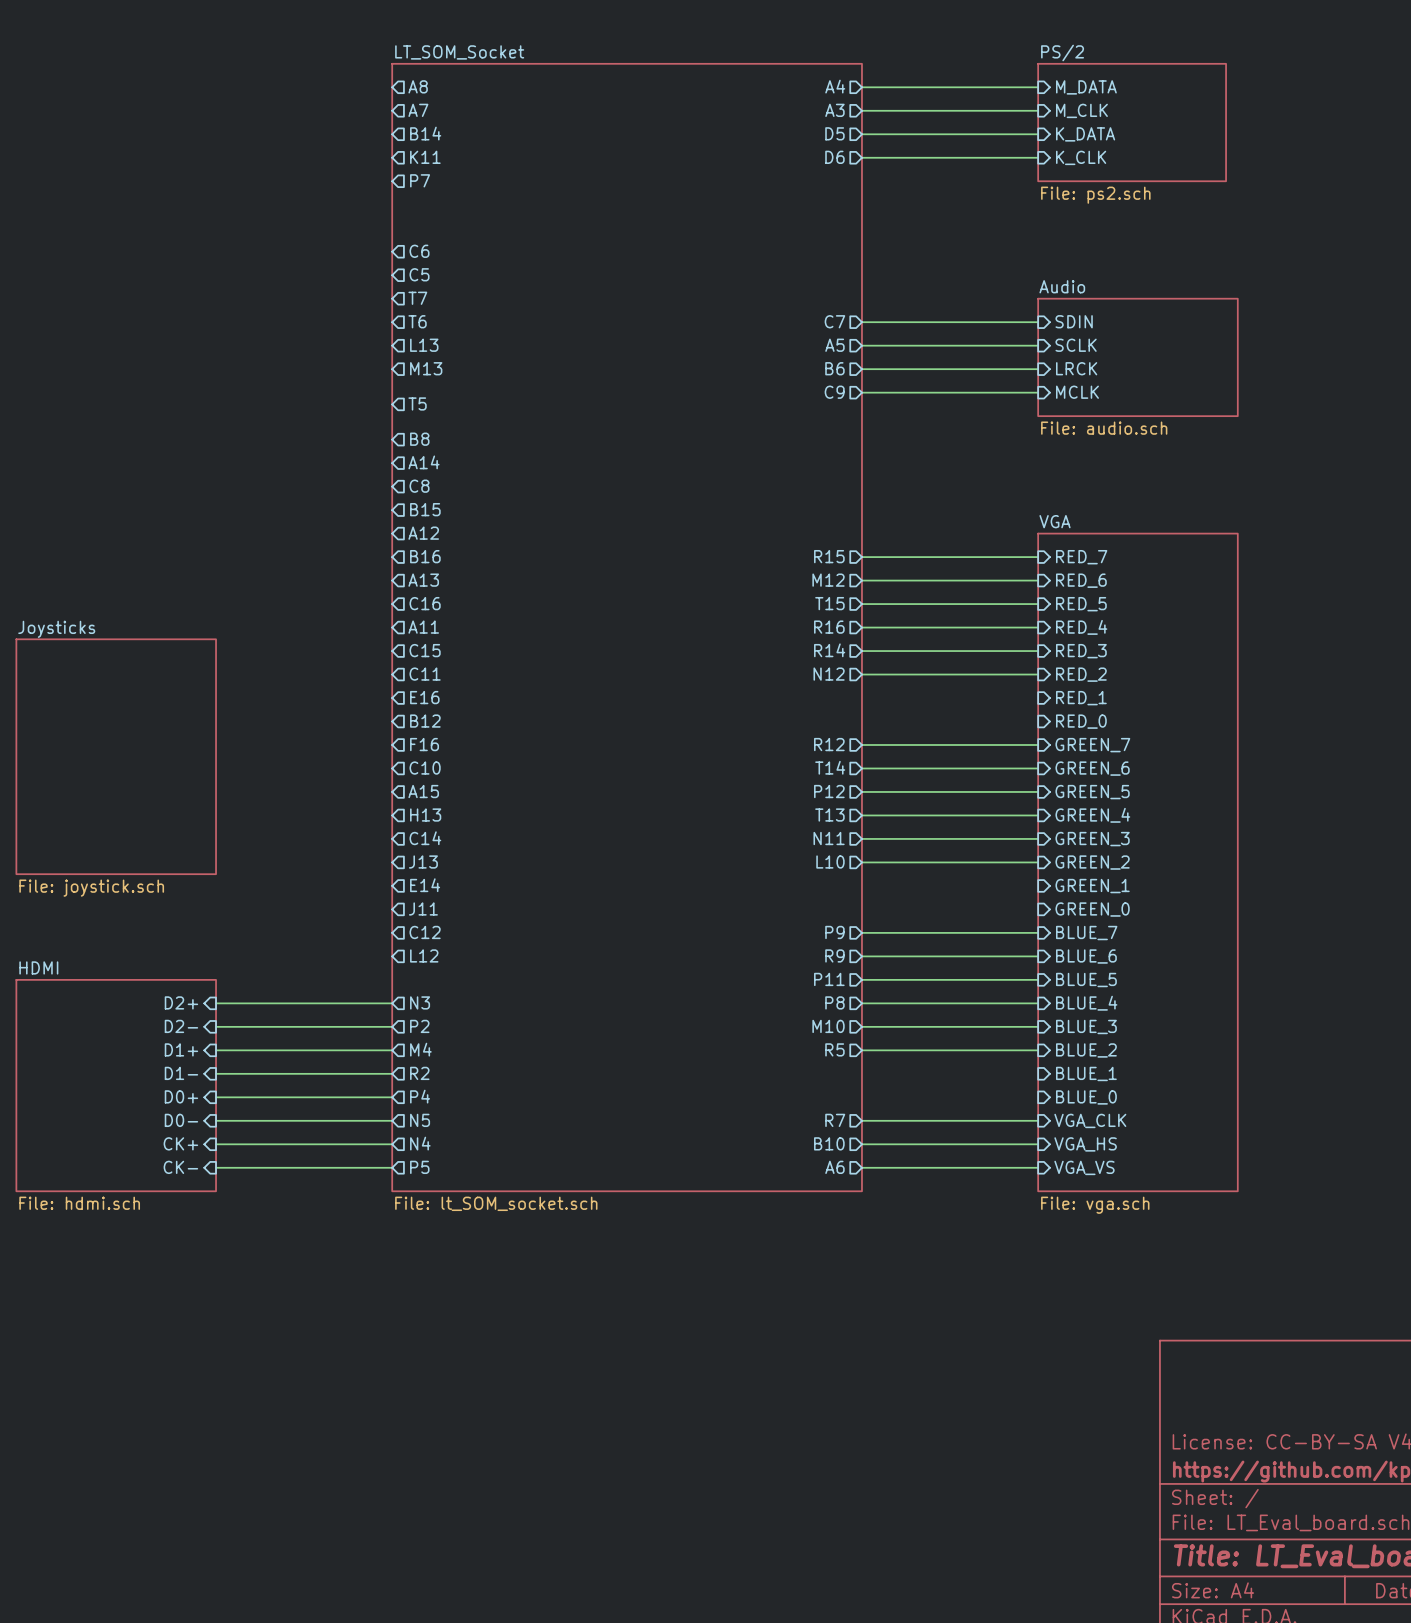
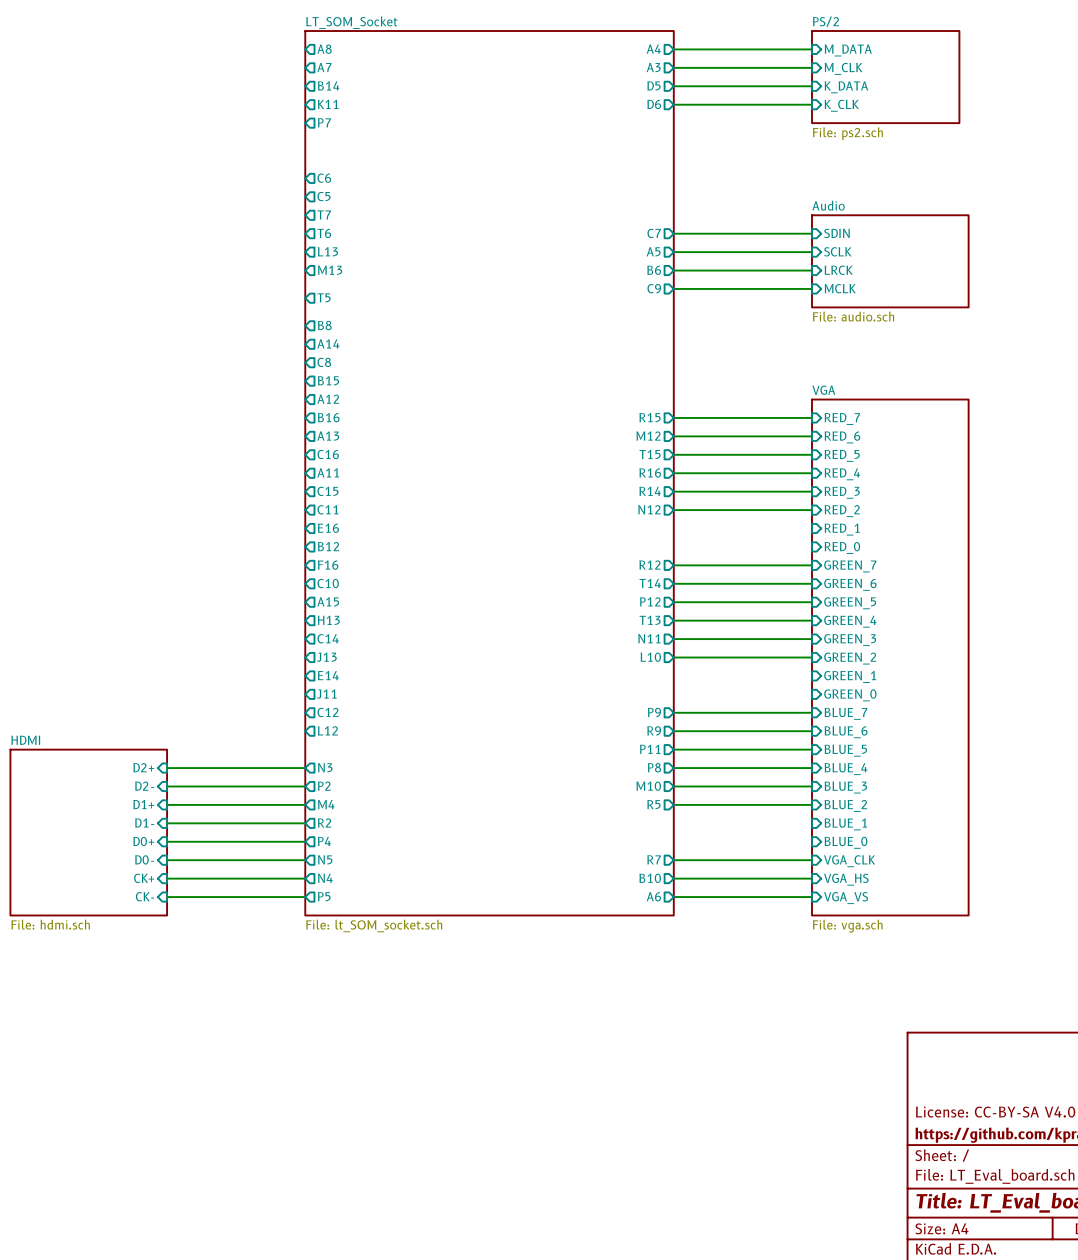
sheet Joysticks: File: joystick.sch (116, 756) -> none

